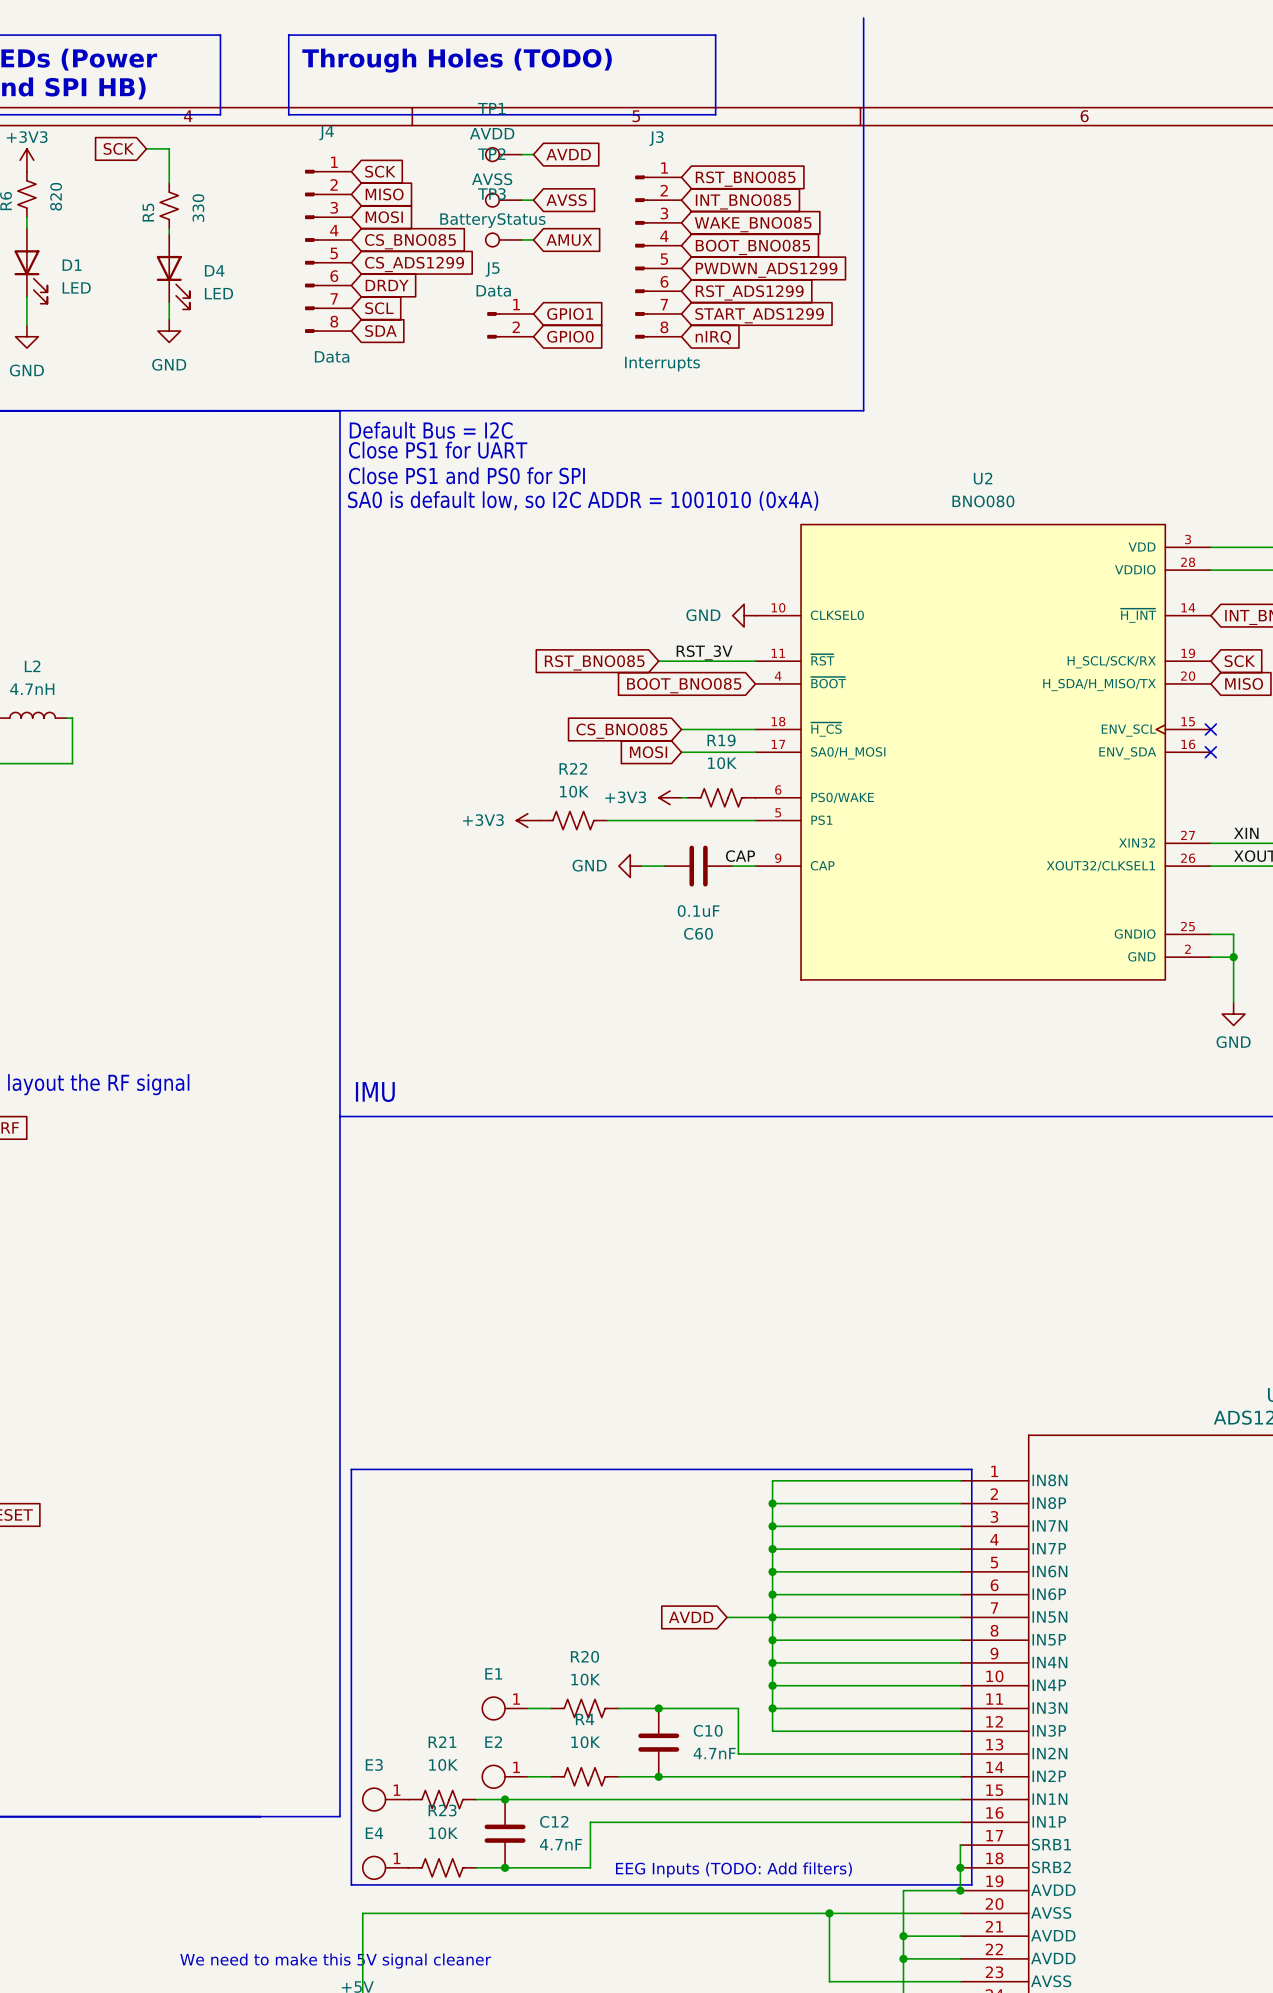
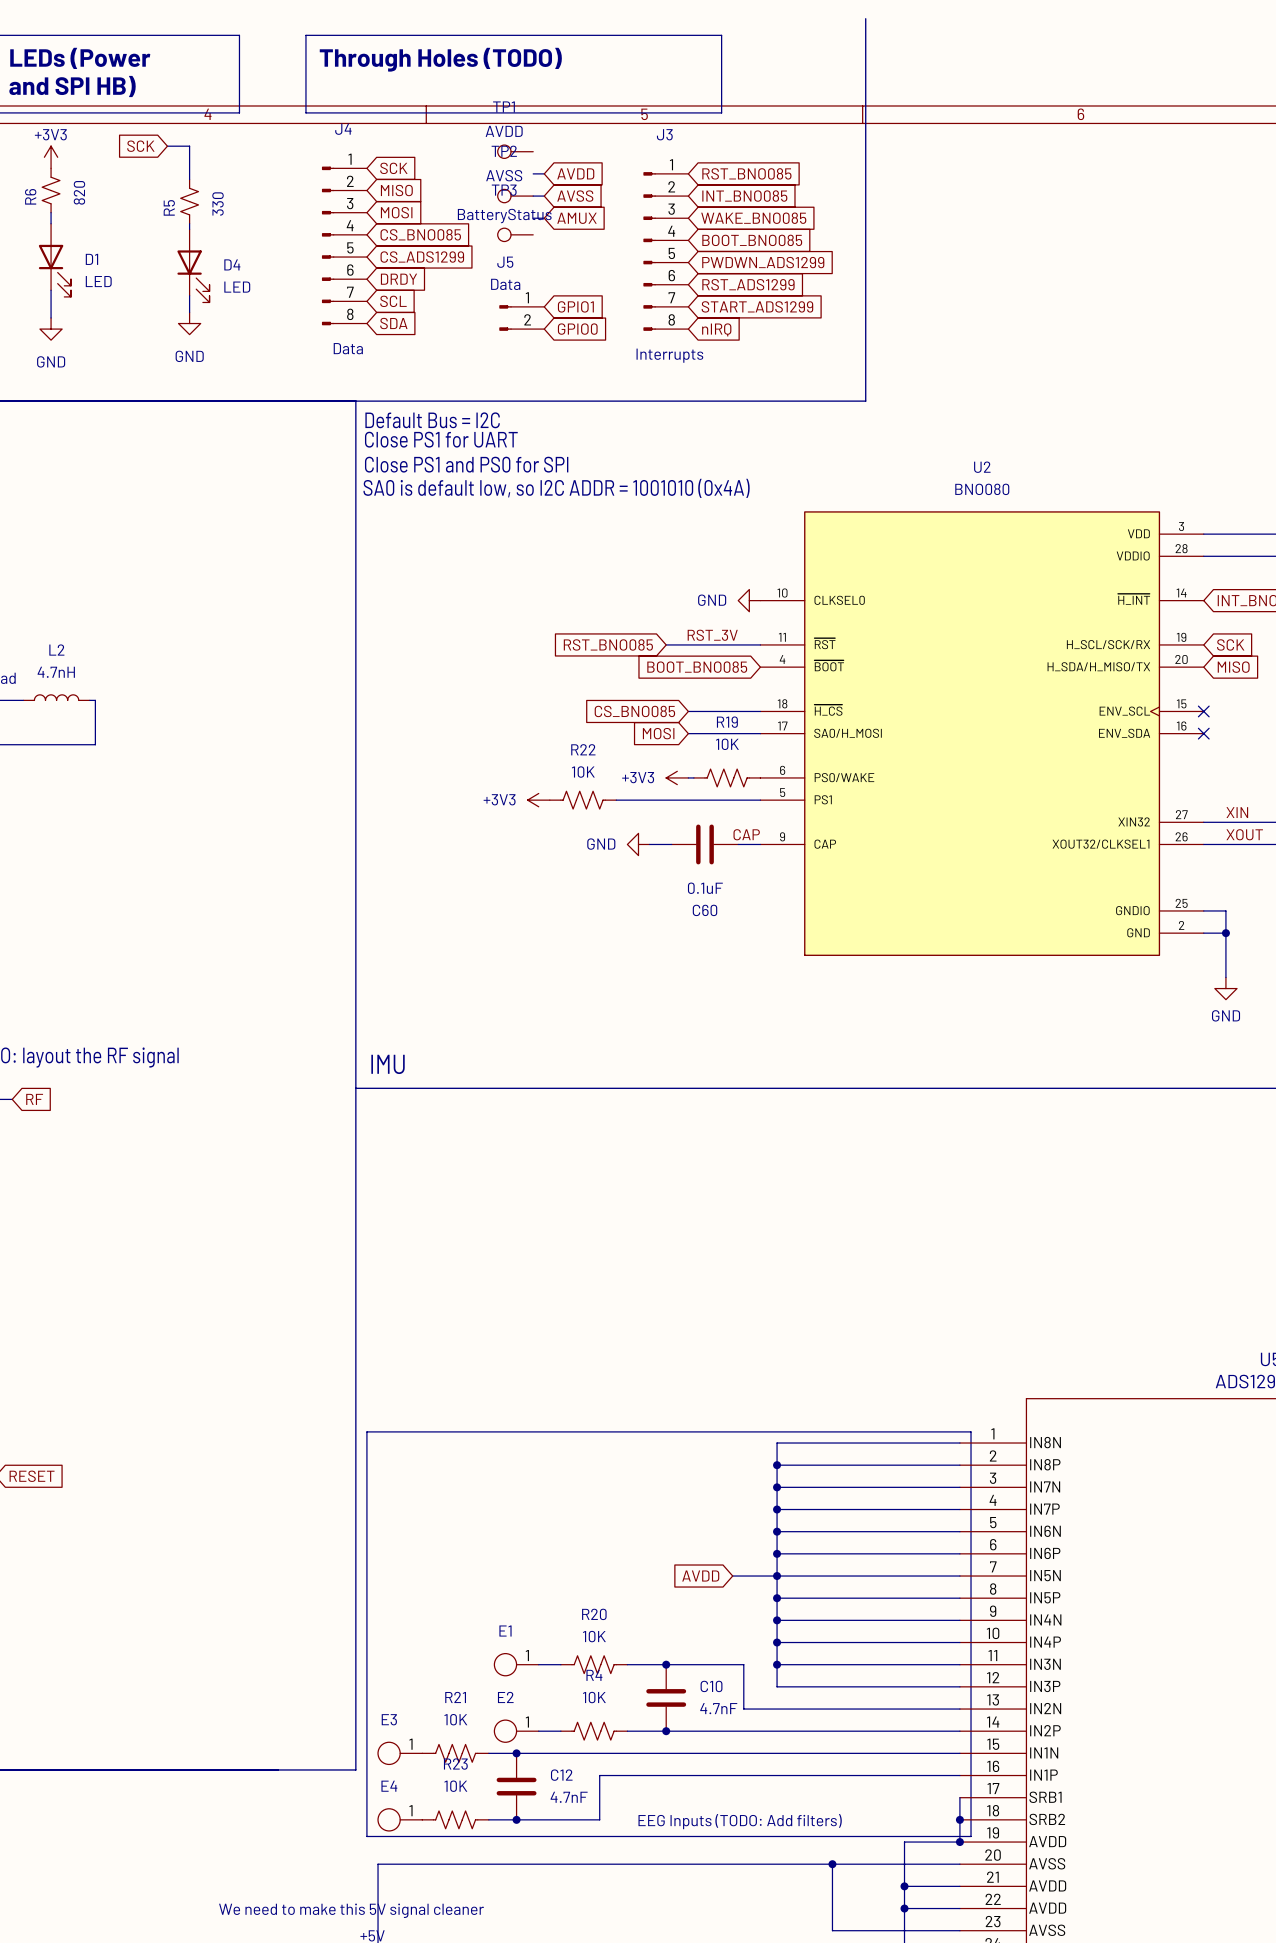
wire: (522, 154) (533, 154) -> (533, 173) (544, 173)
global label position: AVDD (568, 154) -> AVDD (575, 173)
wire: (522, 239) (533, 239) -> (533, 218) (544, 218)
global label position: AMUX (569, 240) -> AMUX (576, 218)

